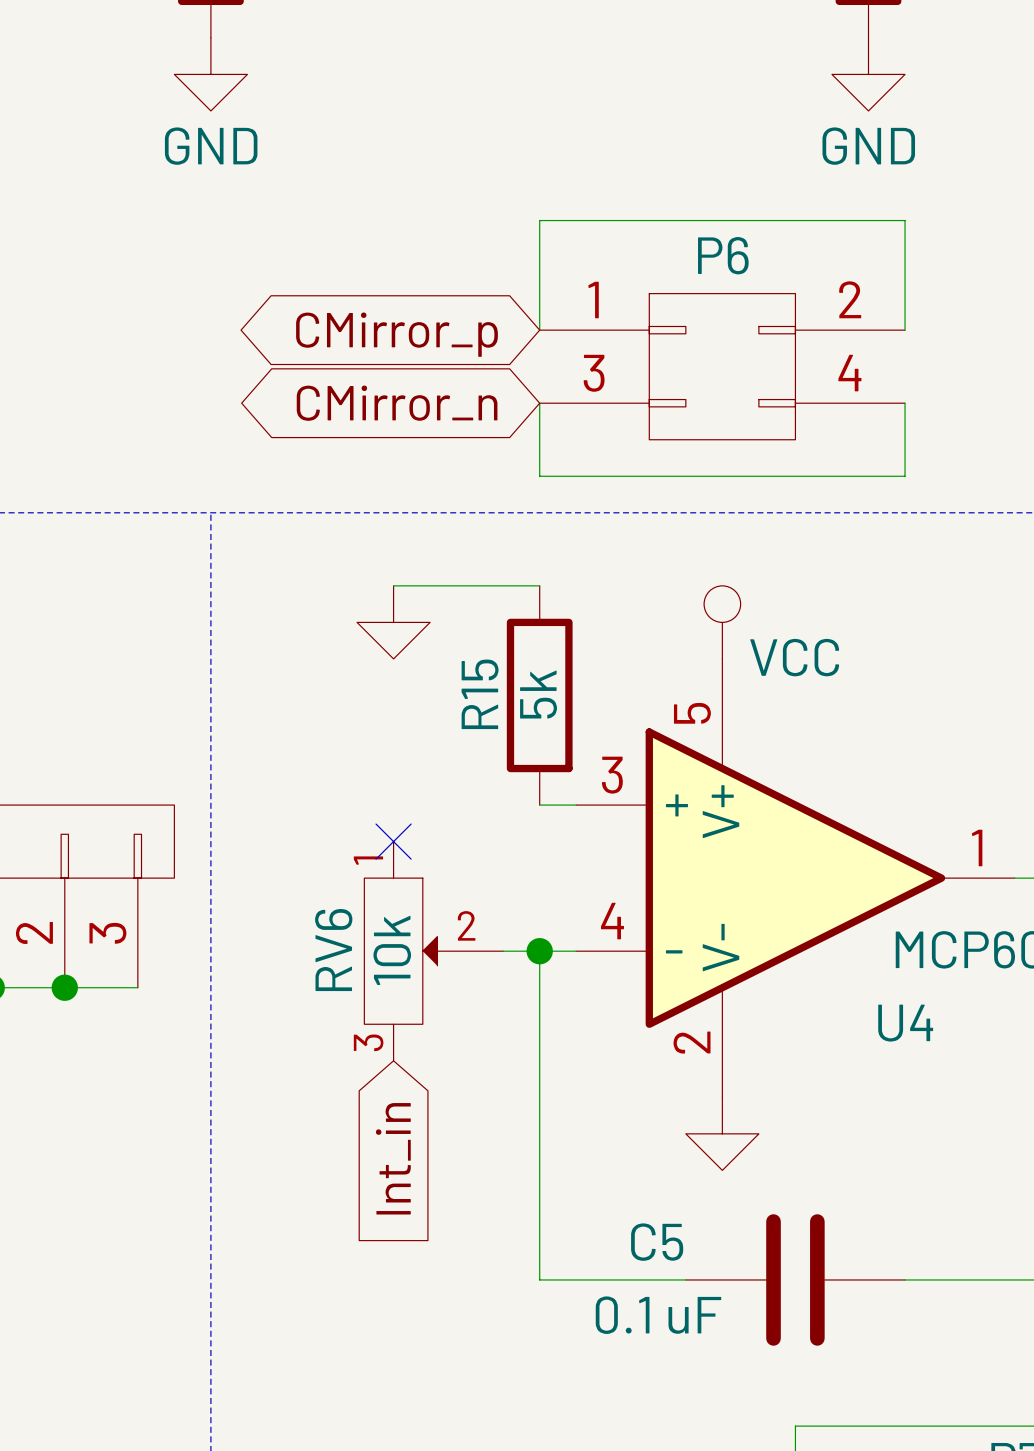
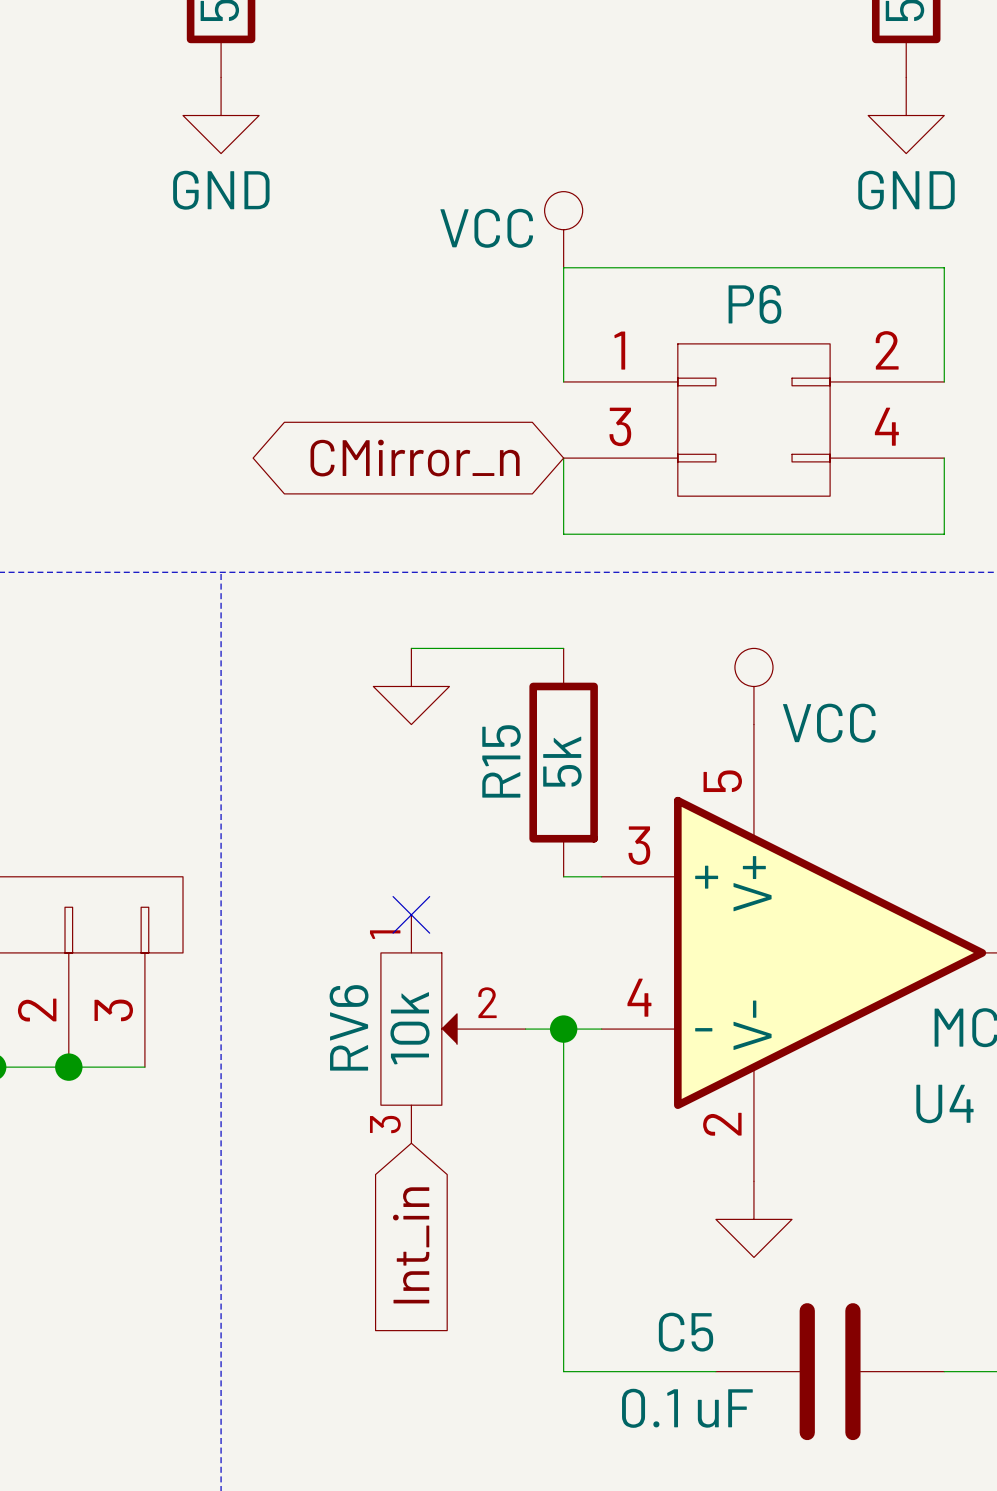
power symbol: none -> VCC (563, 229)
global label: CMirror_p (397, 334) -> none

